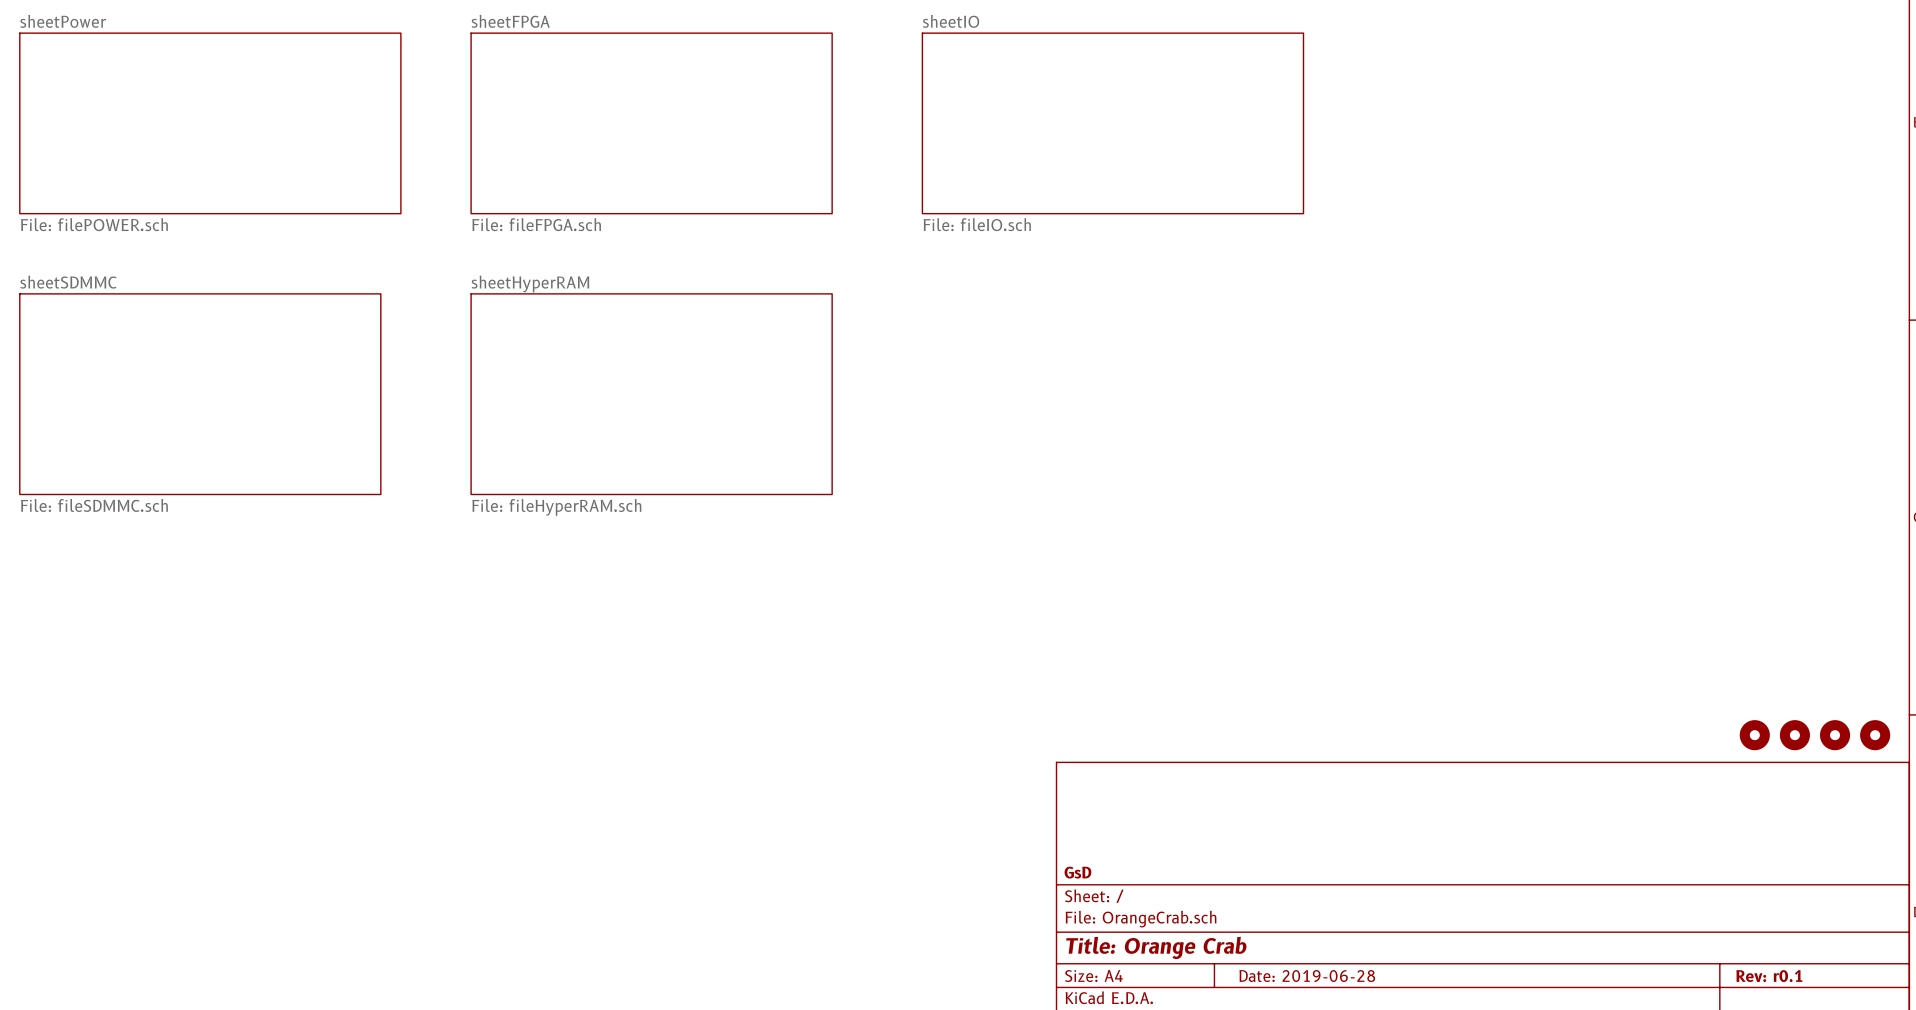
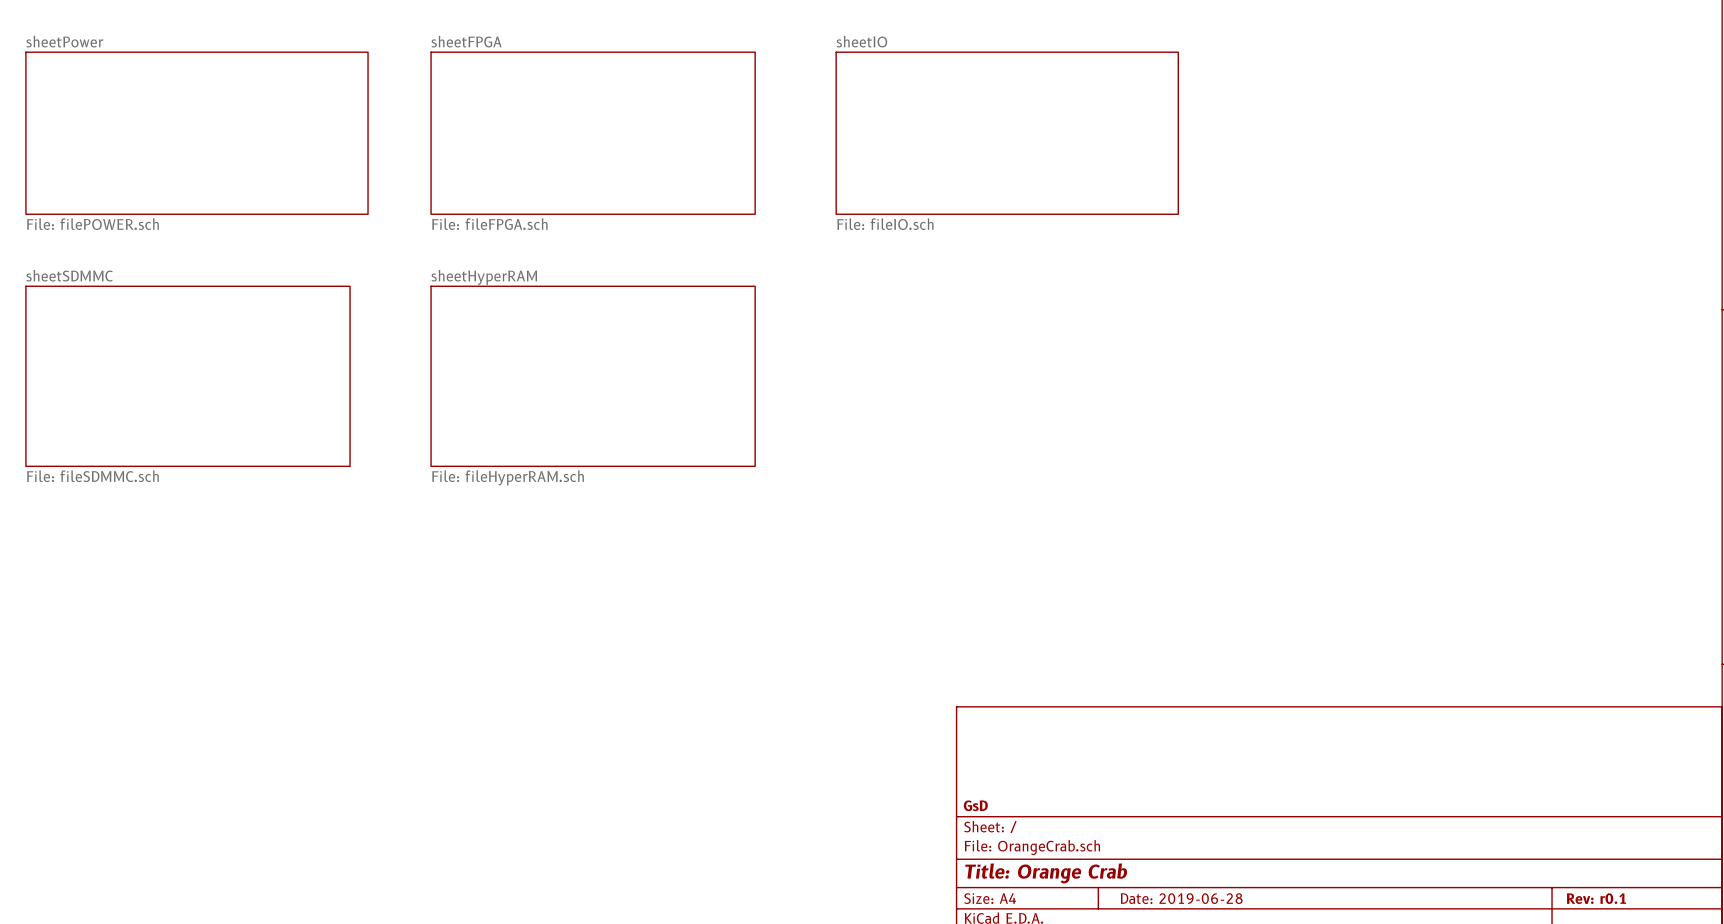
part: (1754, 735) -> none
part: (1794, 735) -> none
part: (1835, 735) -> none
part: (1875, 735) -> none

